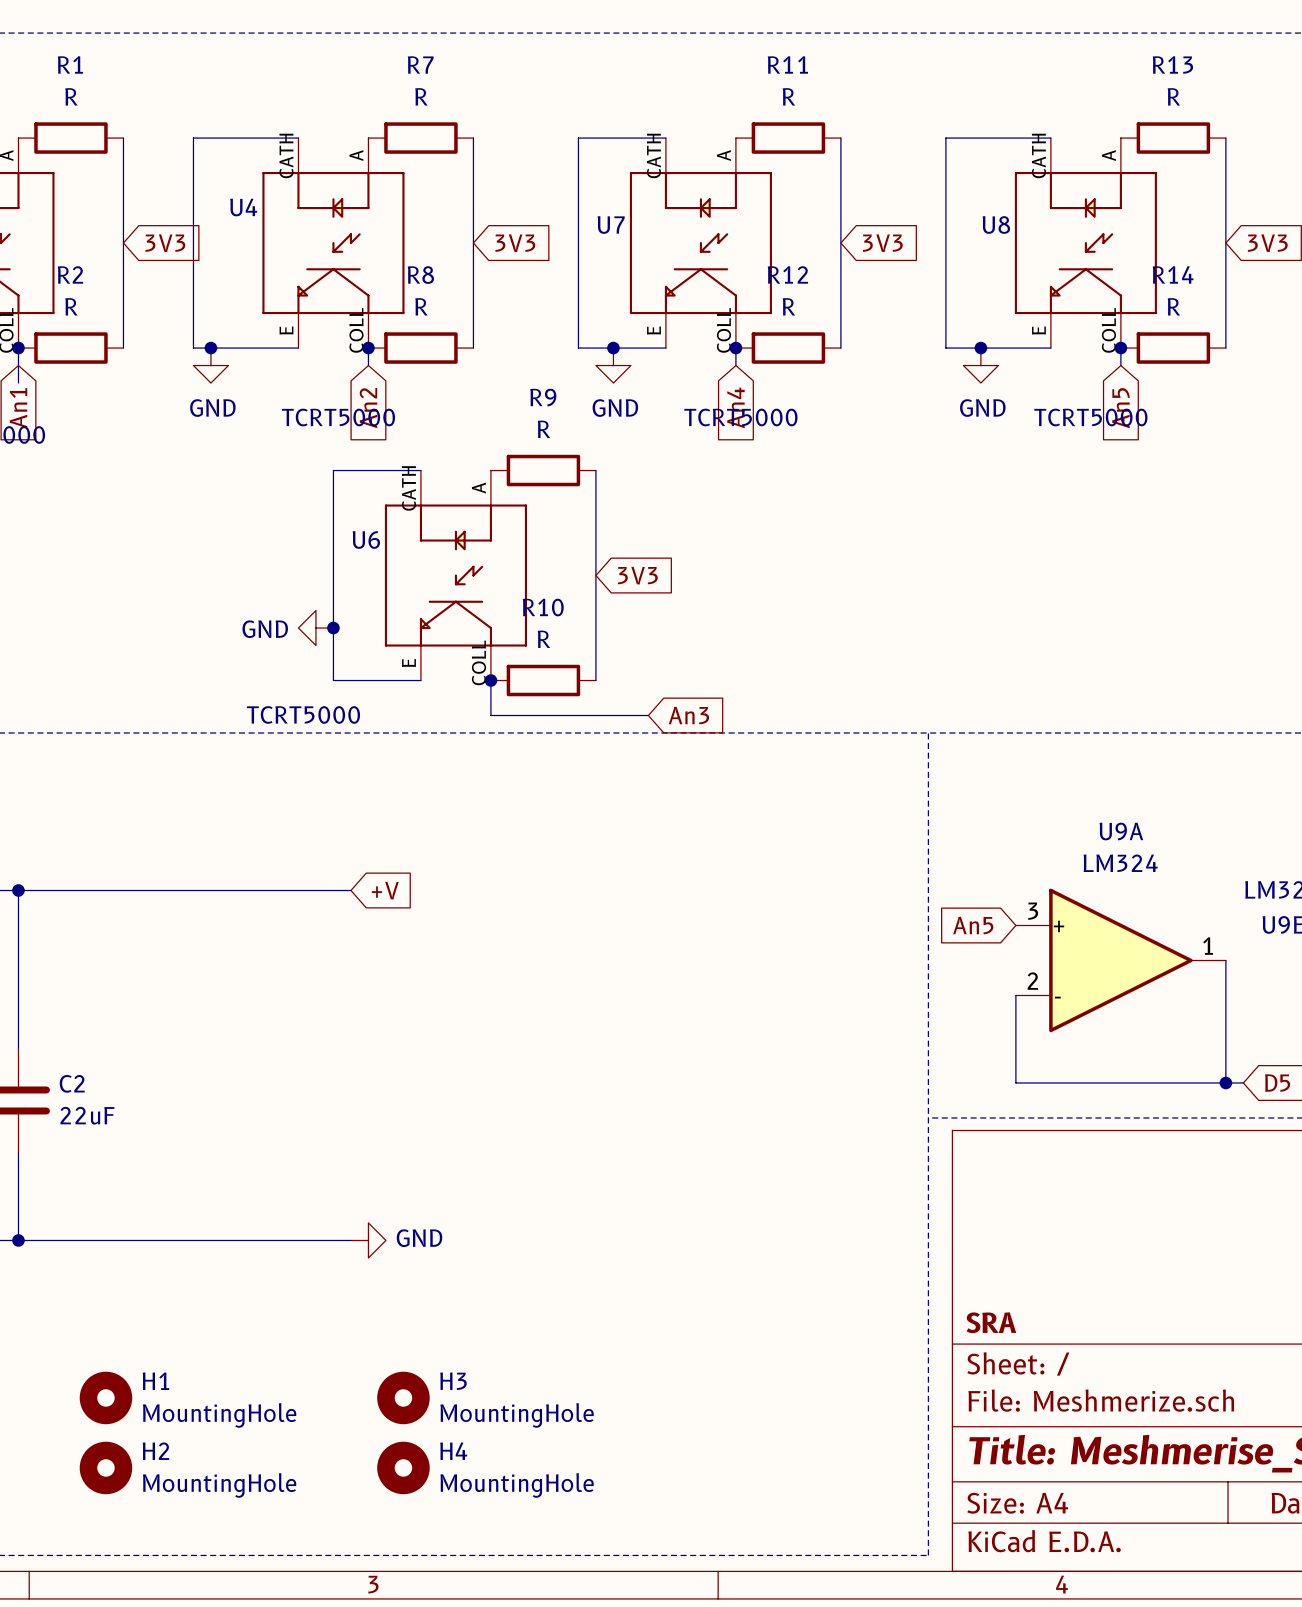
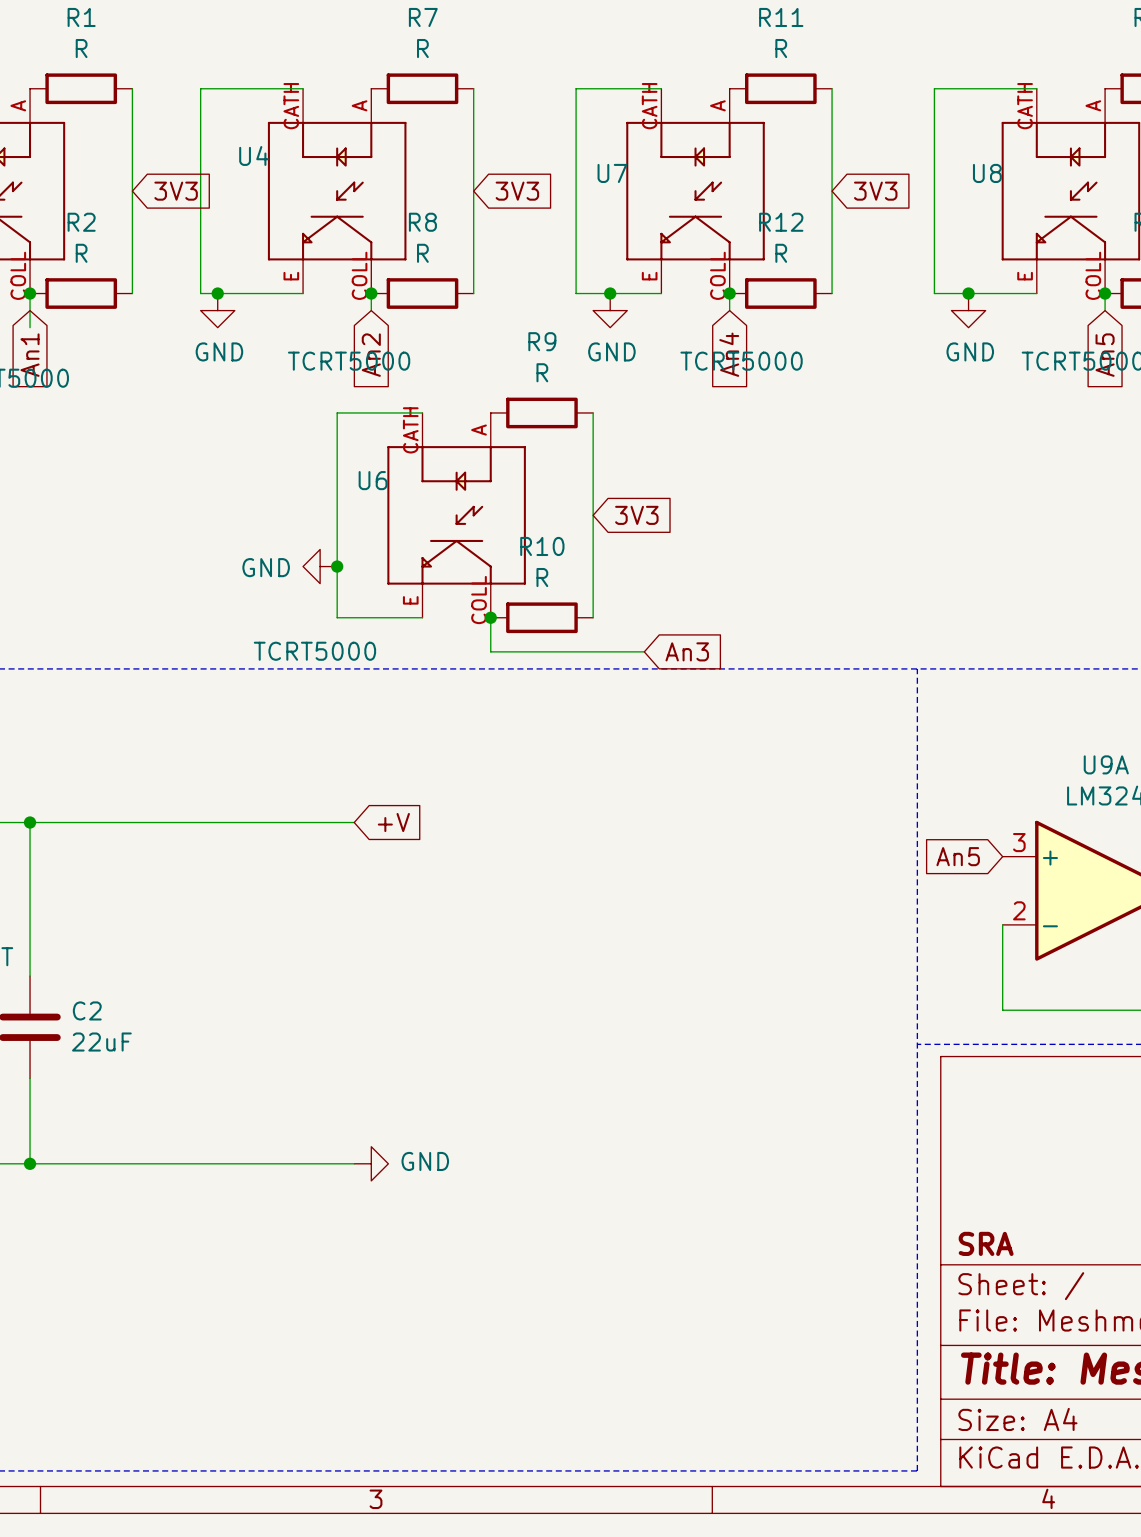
H1: MountingHole (105, 1397) -> none
H3: MountingHole (403, 1397) -> none
H2: MountingHole (105, 1467) -> none
H4: MountingHole (403, 1467) -> none

